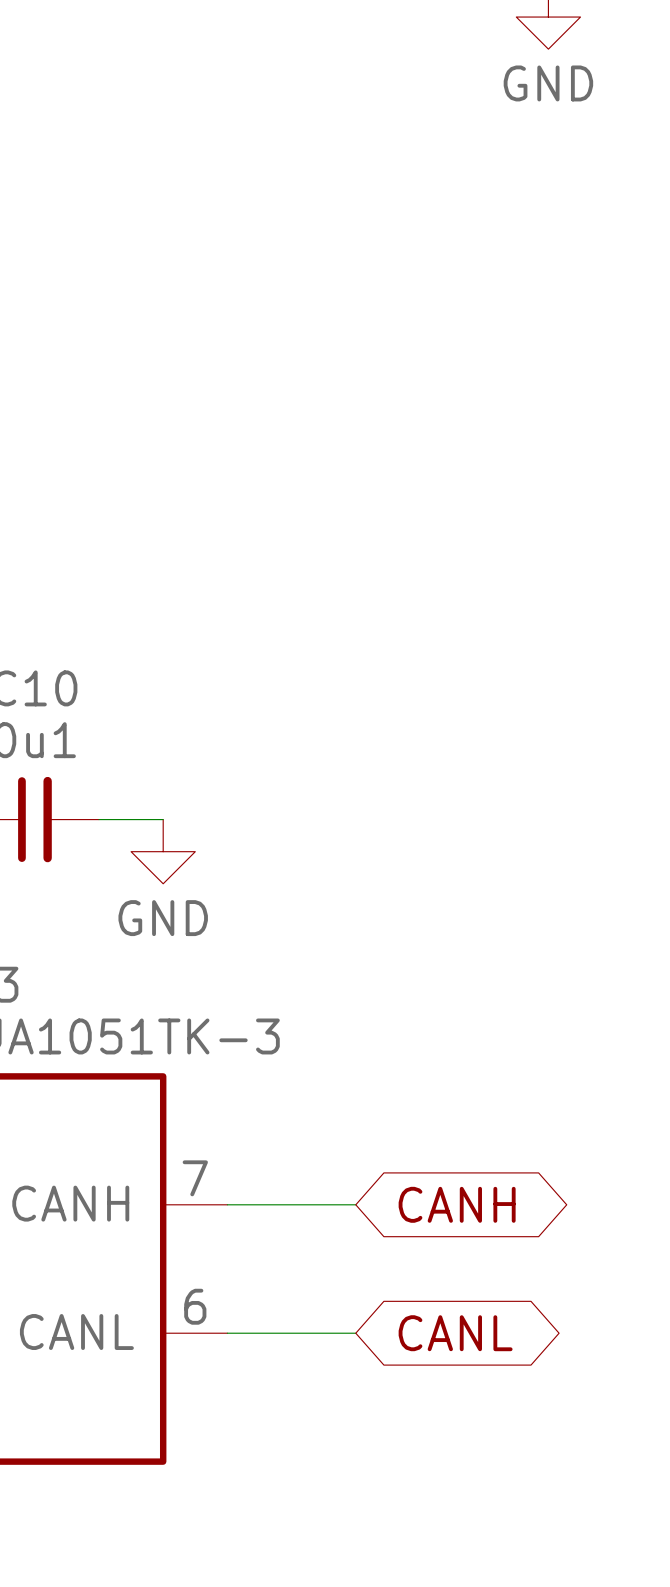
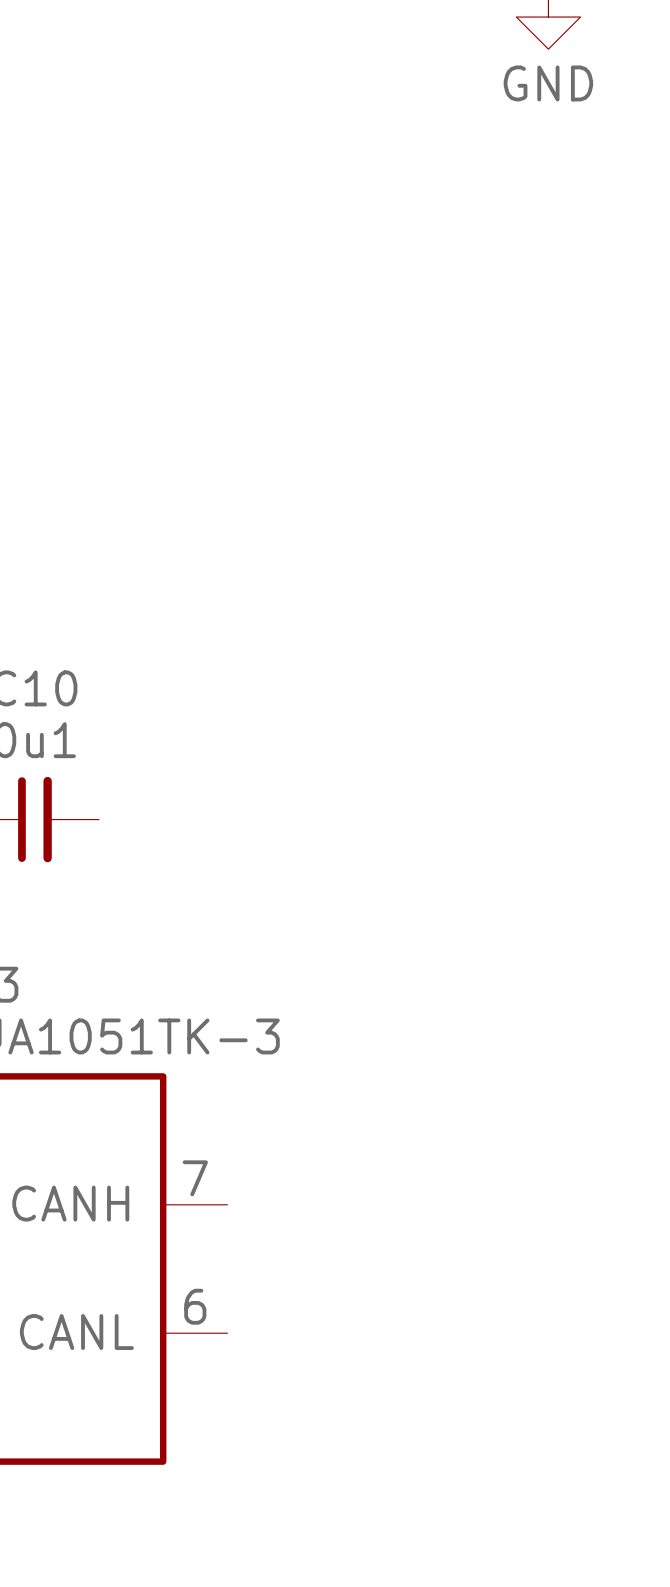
wire: (98, 819) (163, 819) -> none
power symbol: GND (163, 851) -> none
wire: (227, 1204) (355, 1204) -> none
global label: CANH (457, 1204) -> none
wire: (227, 1333) (355, 1333) -> none
global label: CANL (455, 1333) -> none

